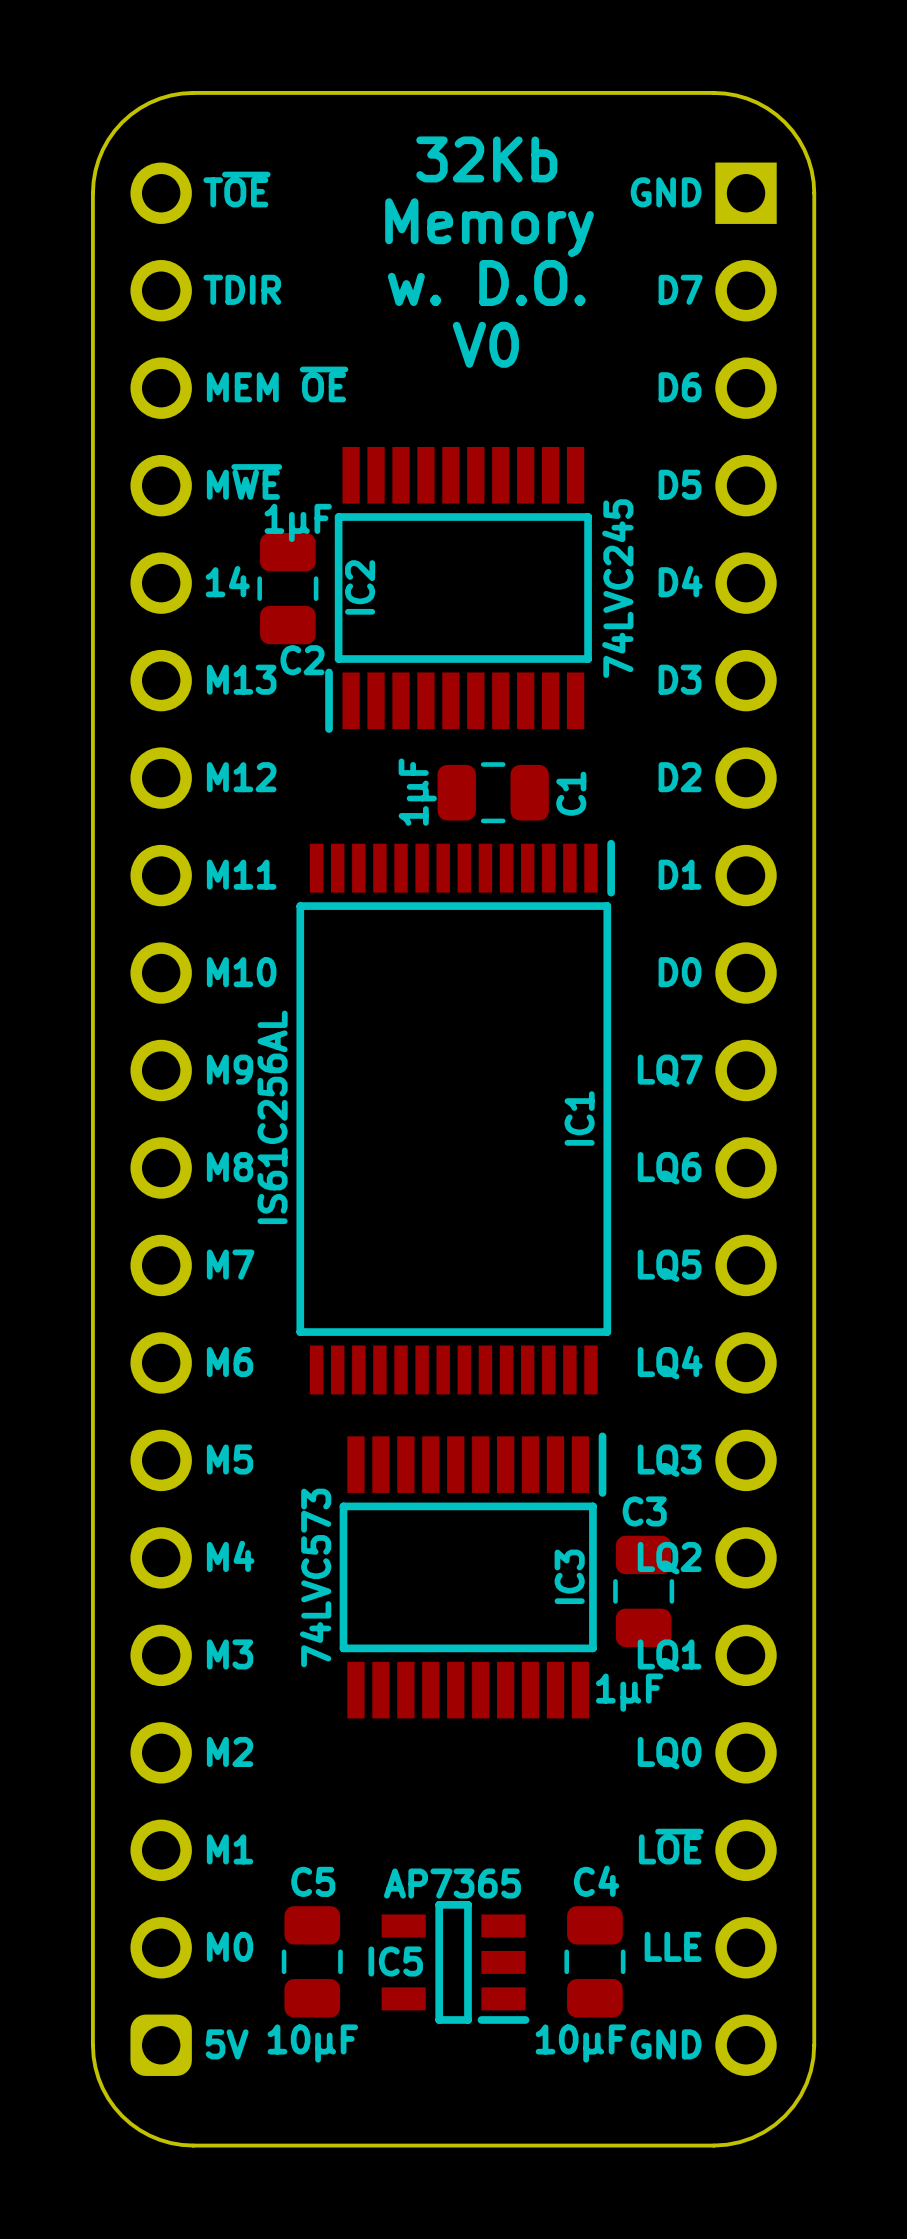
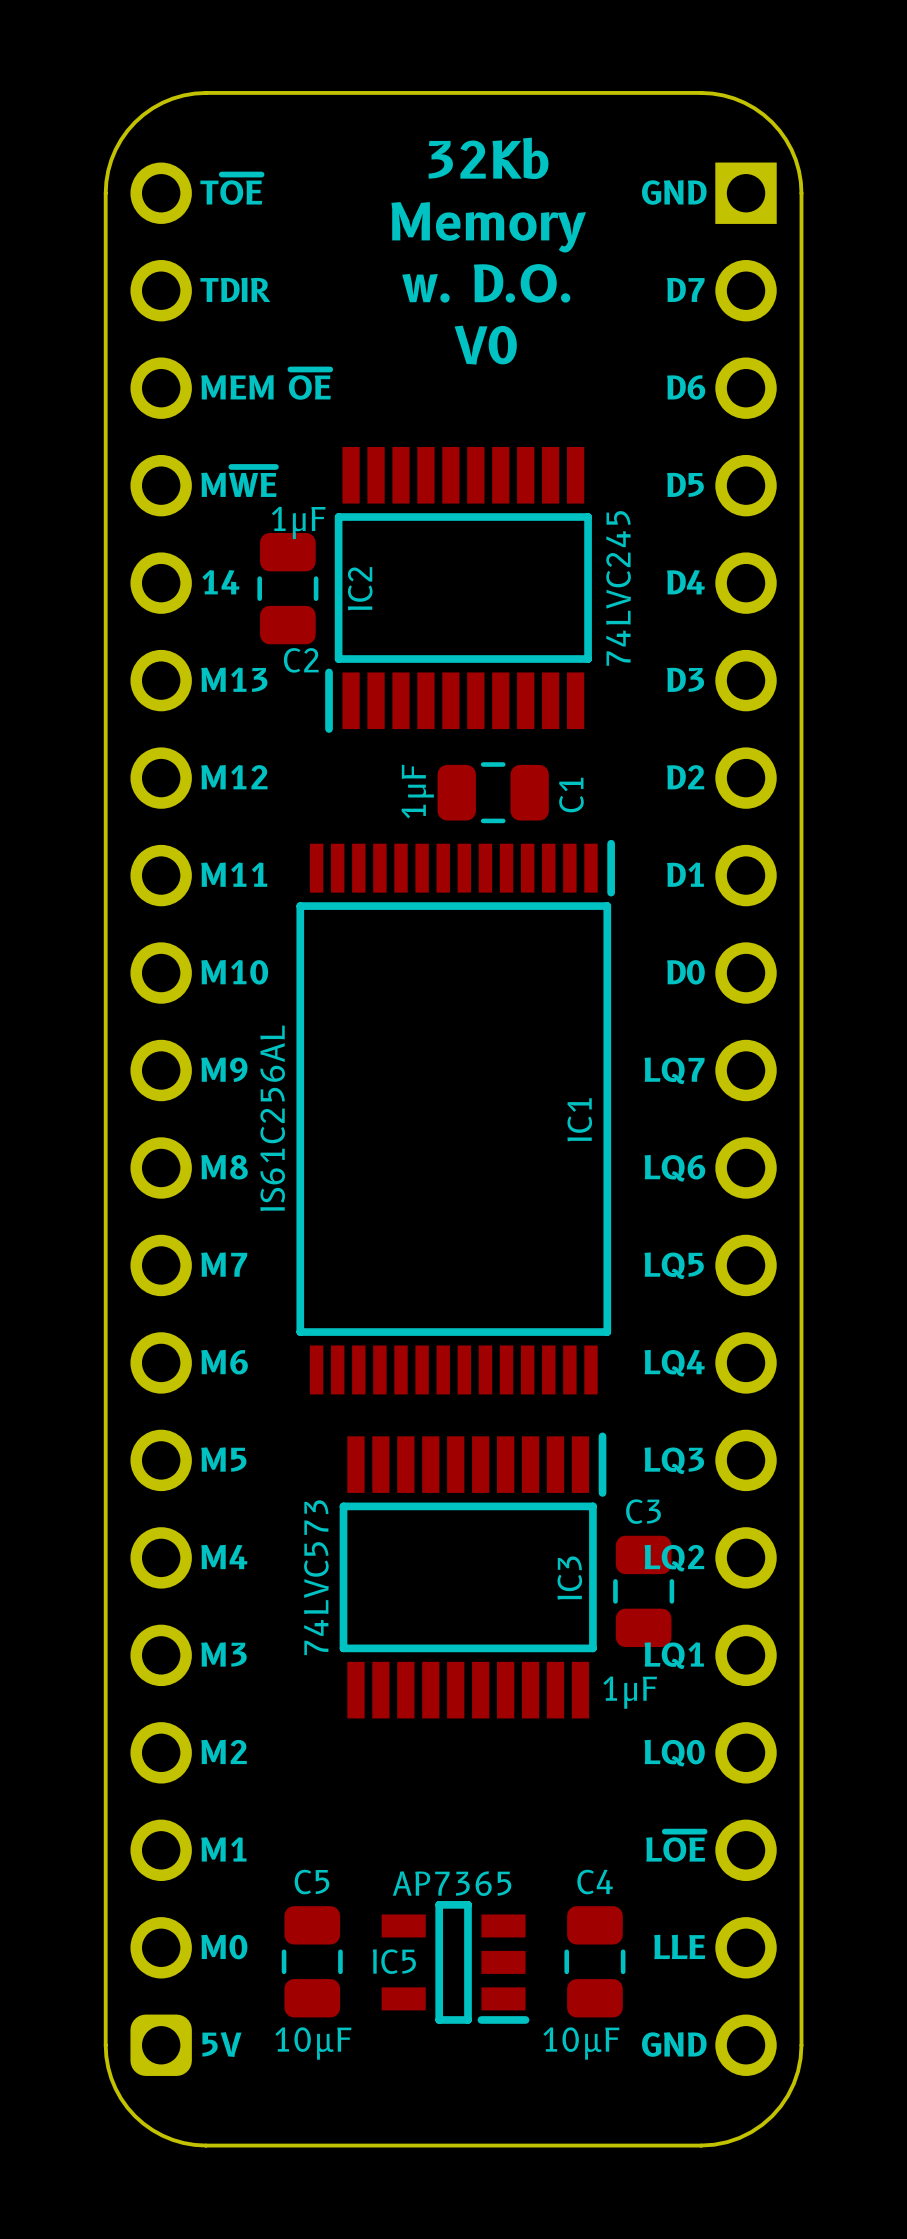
part footprint: [91, 91, 817, 2148] -> [103, 91, 804, 2148]

